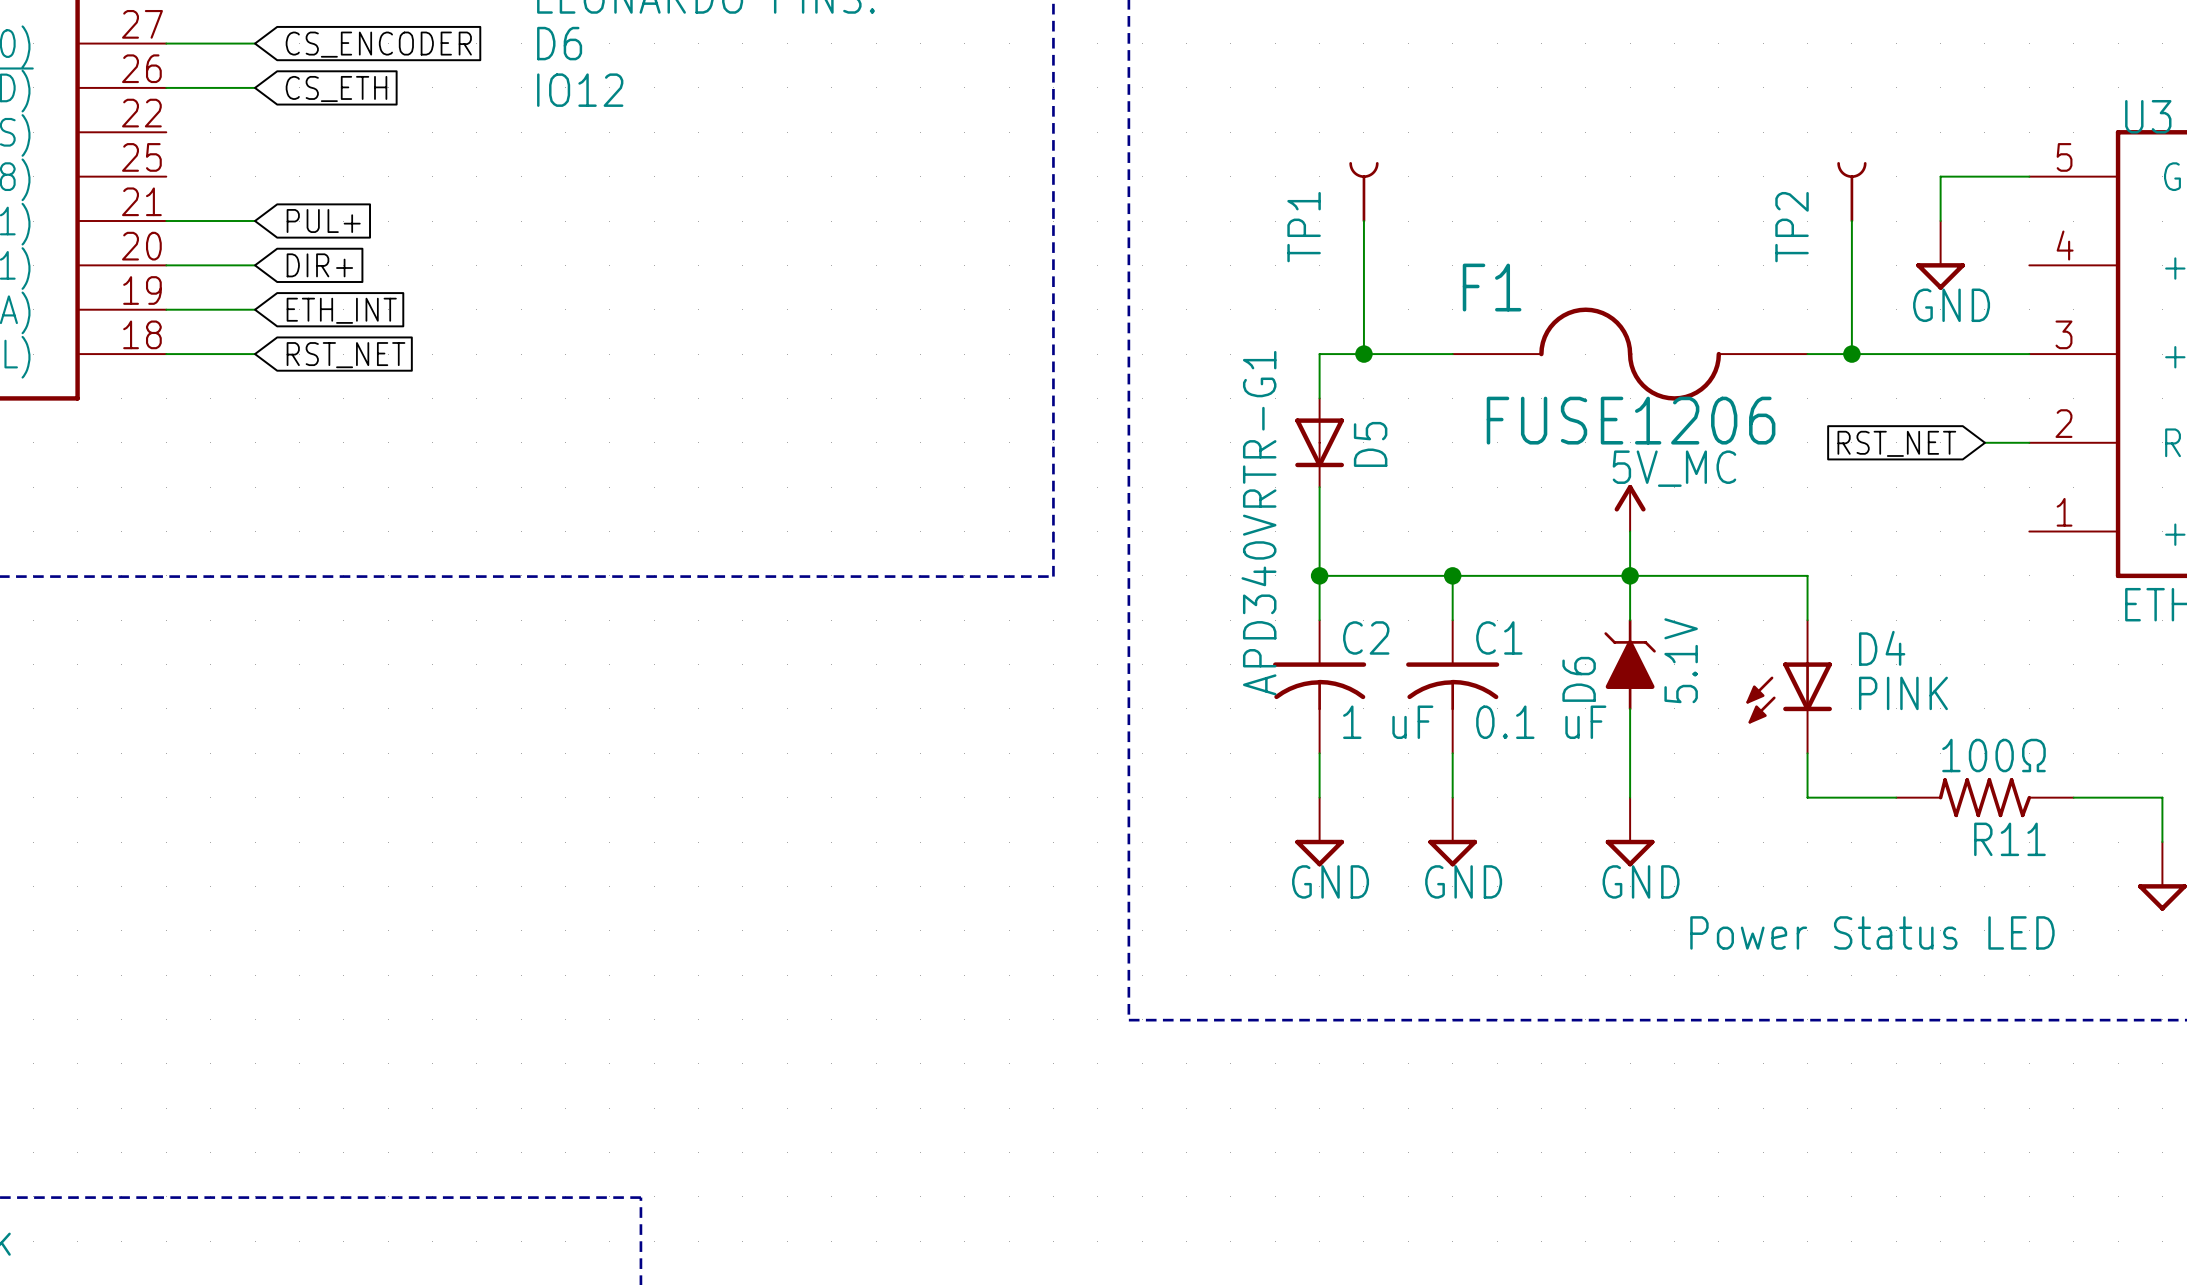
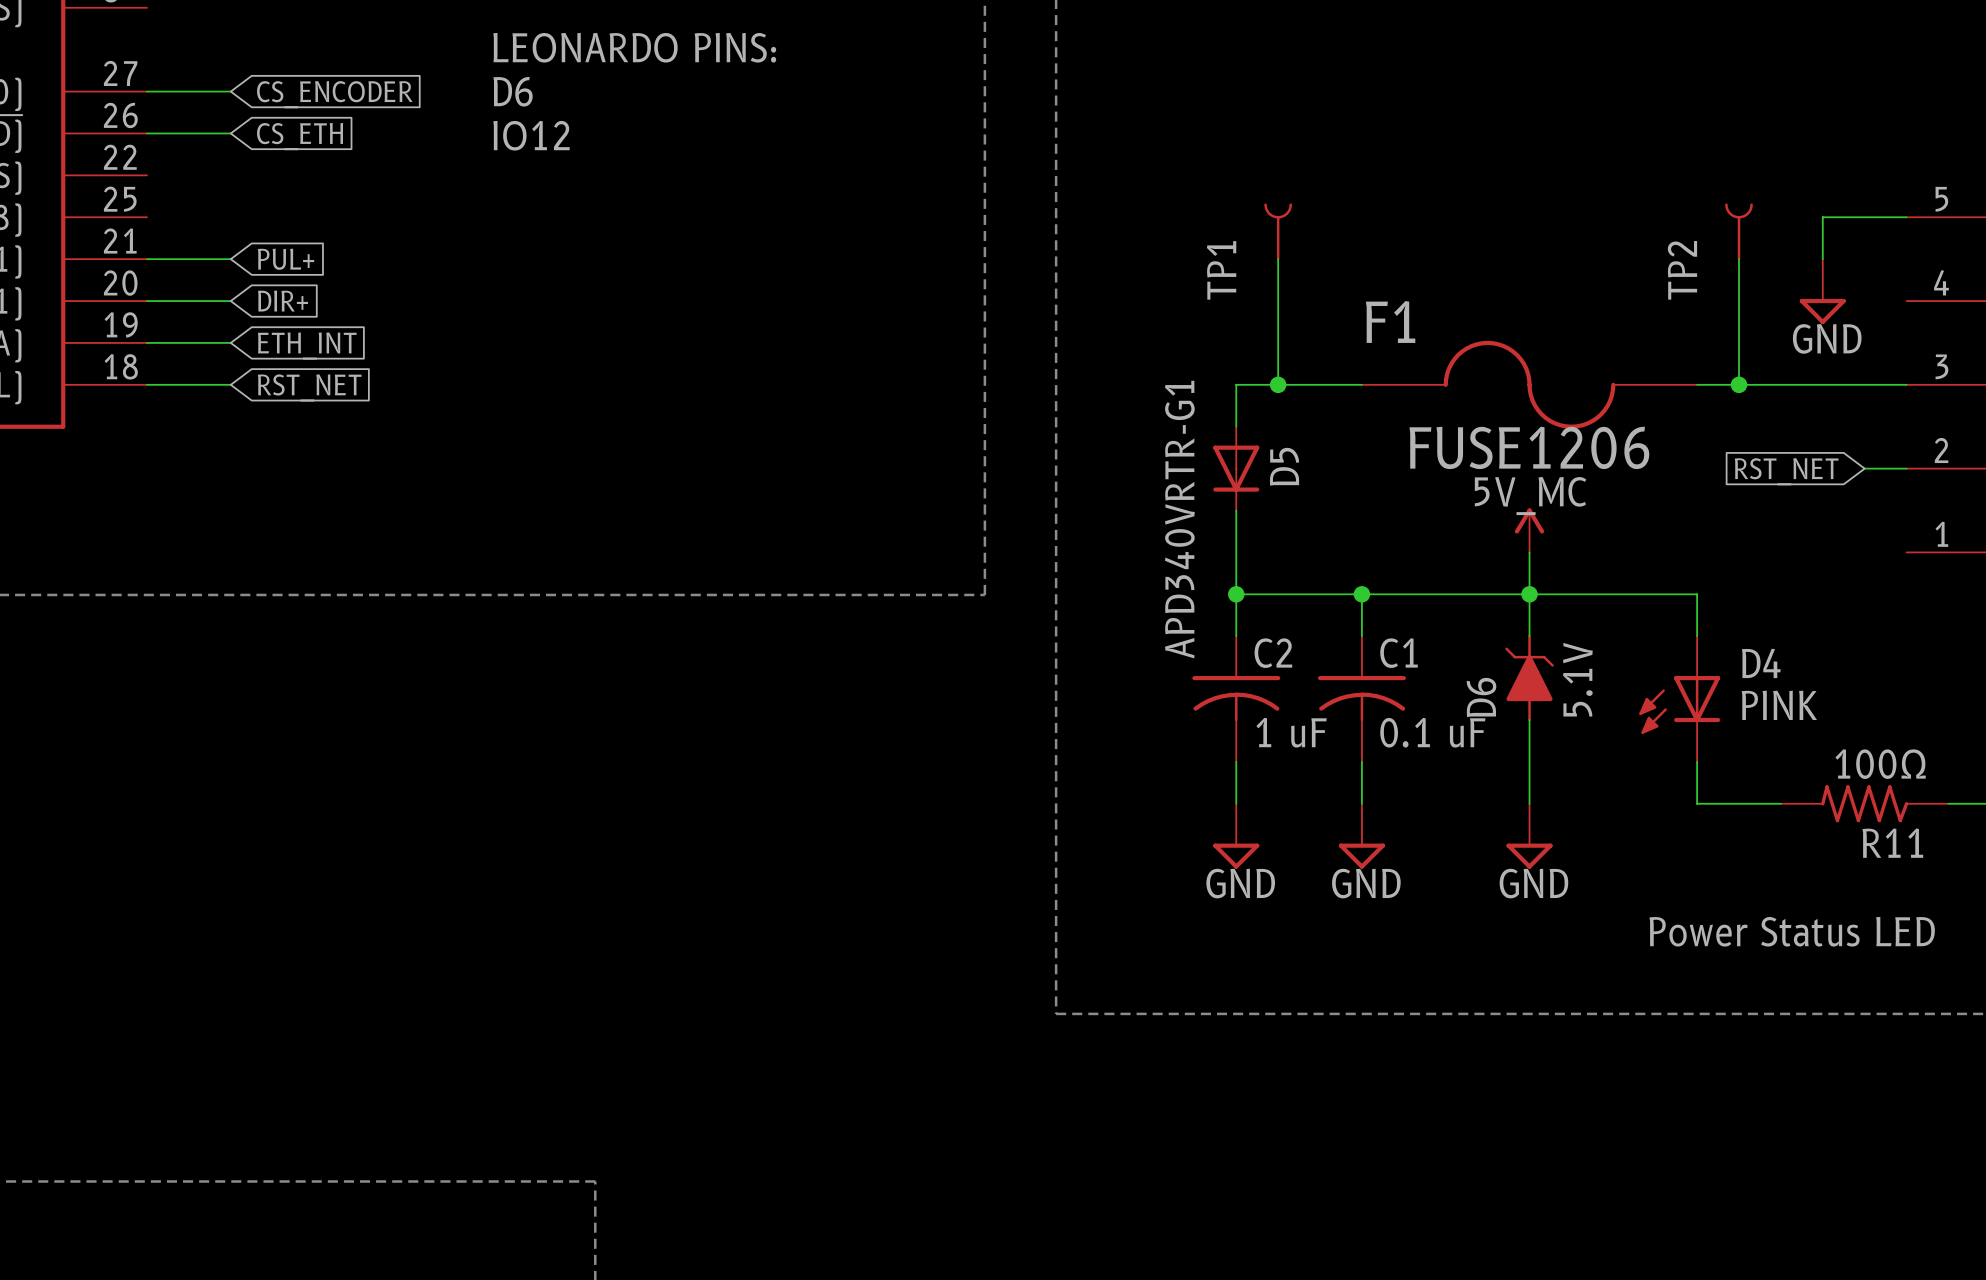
power symbol text position: 5V_MC (1674, 468) -> 5V_MC (1530, 496)

